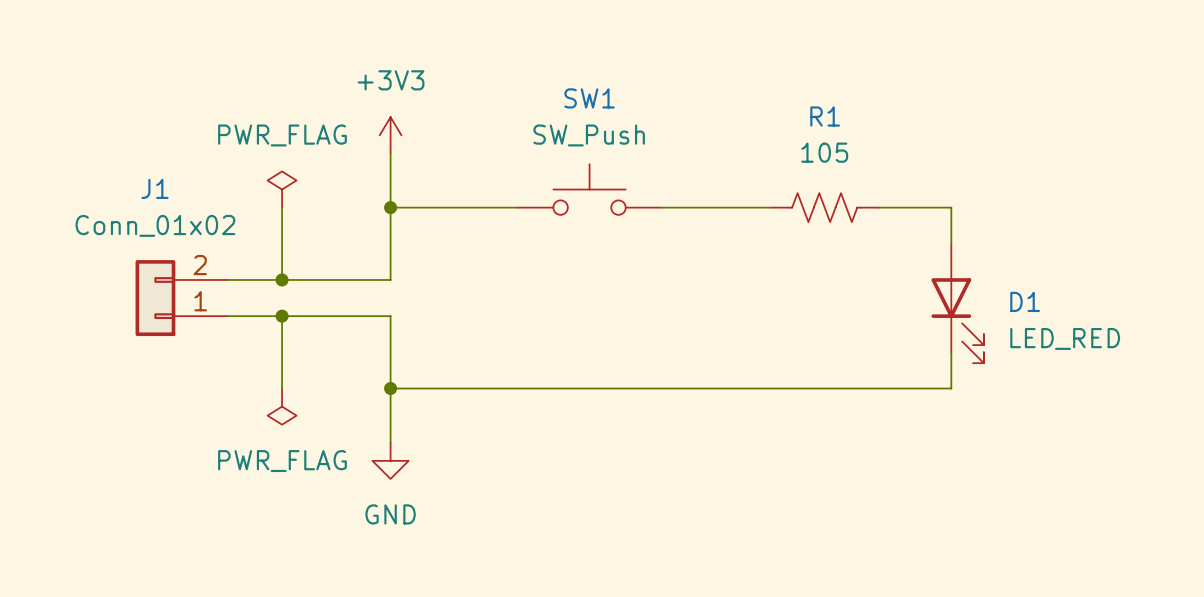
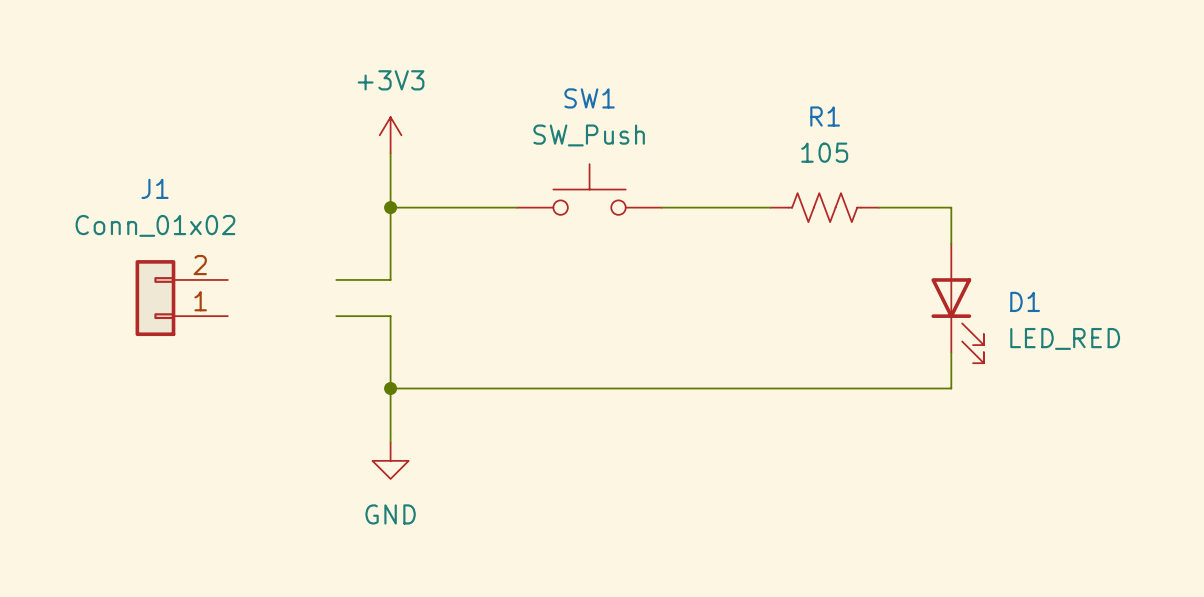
power symbol: PWR_FLAG (282, 189) -> none
wire: (282, 207) (282, 279) -> none
wire: (227, 279) (336, 279) -> none
junction: (282, 279) -> none
wire: (227, 316) (336, 316) -> none
wire: (282, 316) (282, 388) -> none
junction: (282, 316) -> none
power symbol: PWR_FLAG (282, 406) -> none

